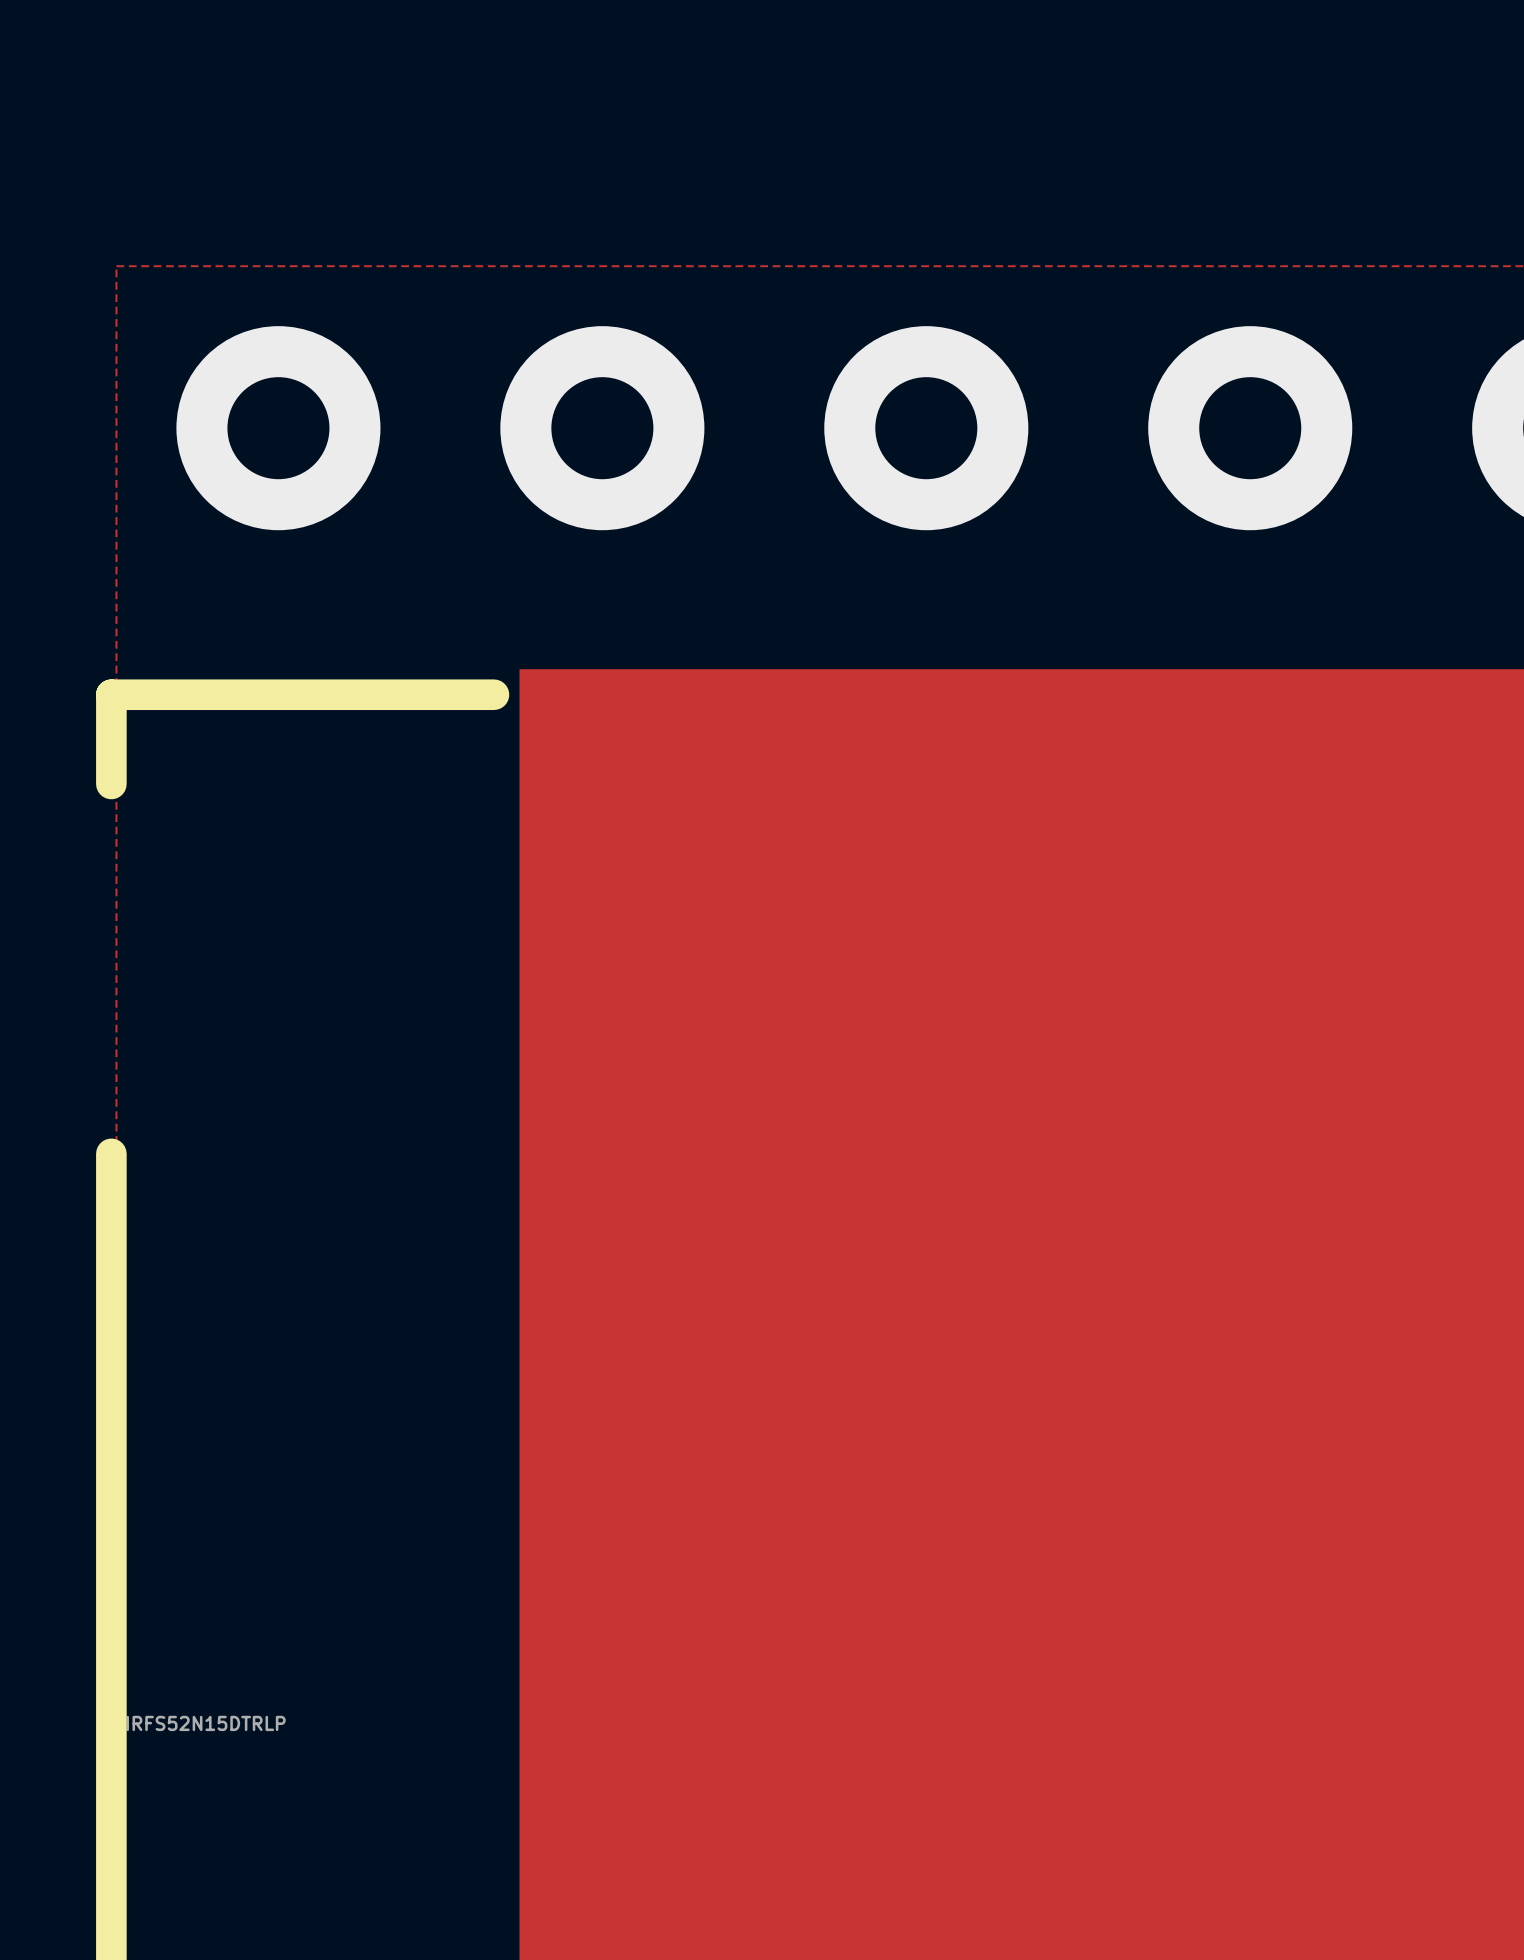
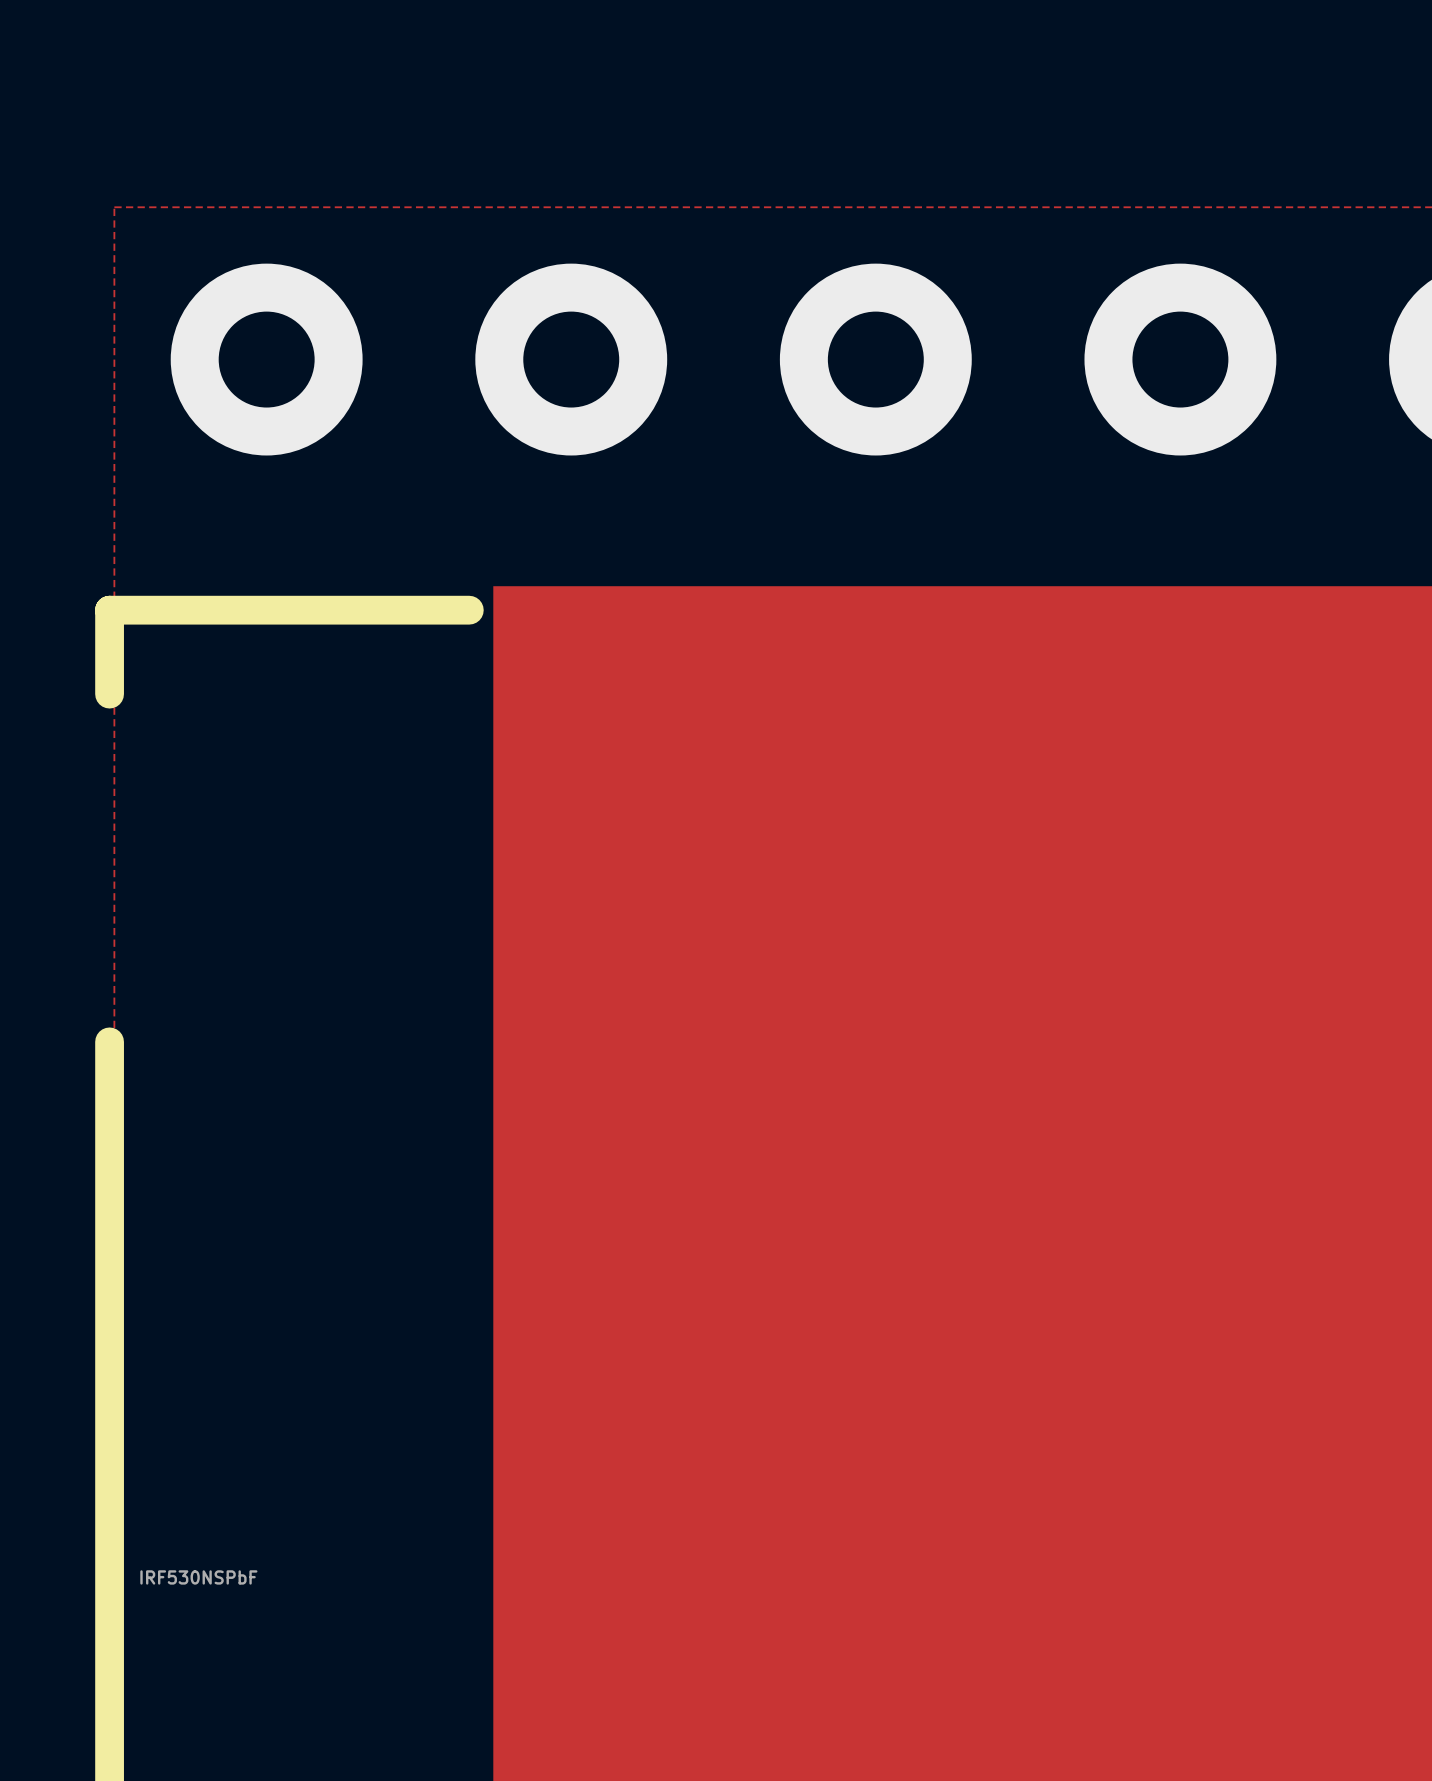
part value: IRFS52N15DTRLP (206, 1723) -> IRF530NSPbF (198, 1577)

